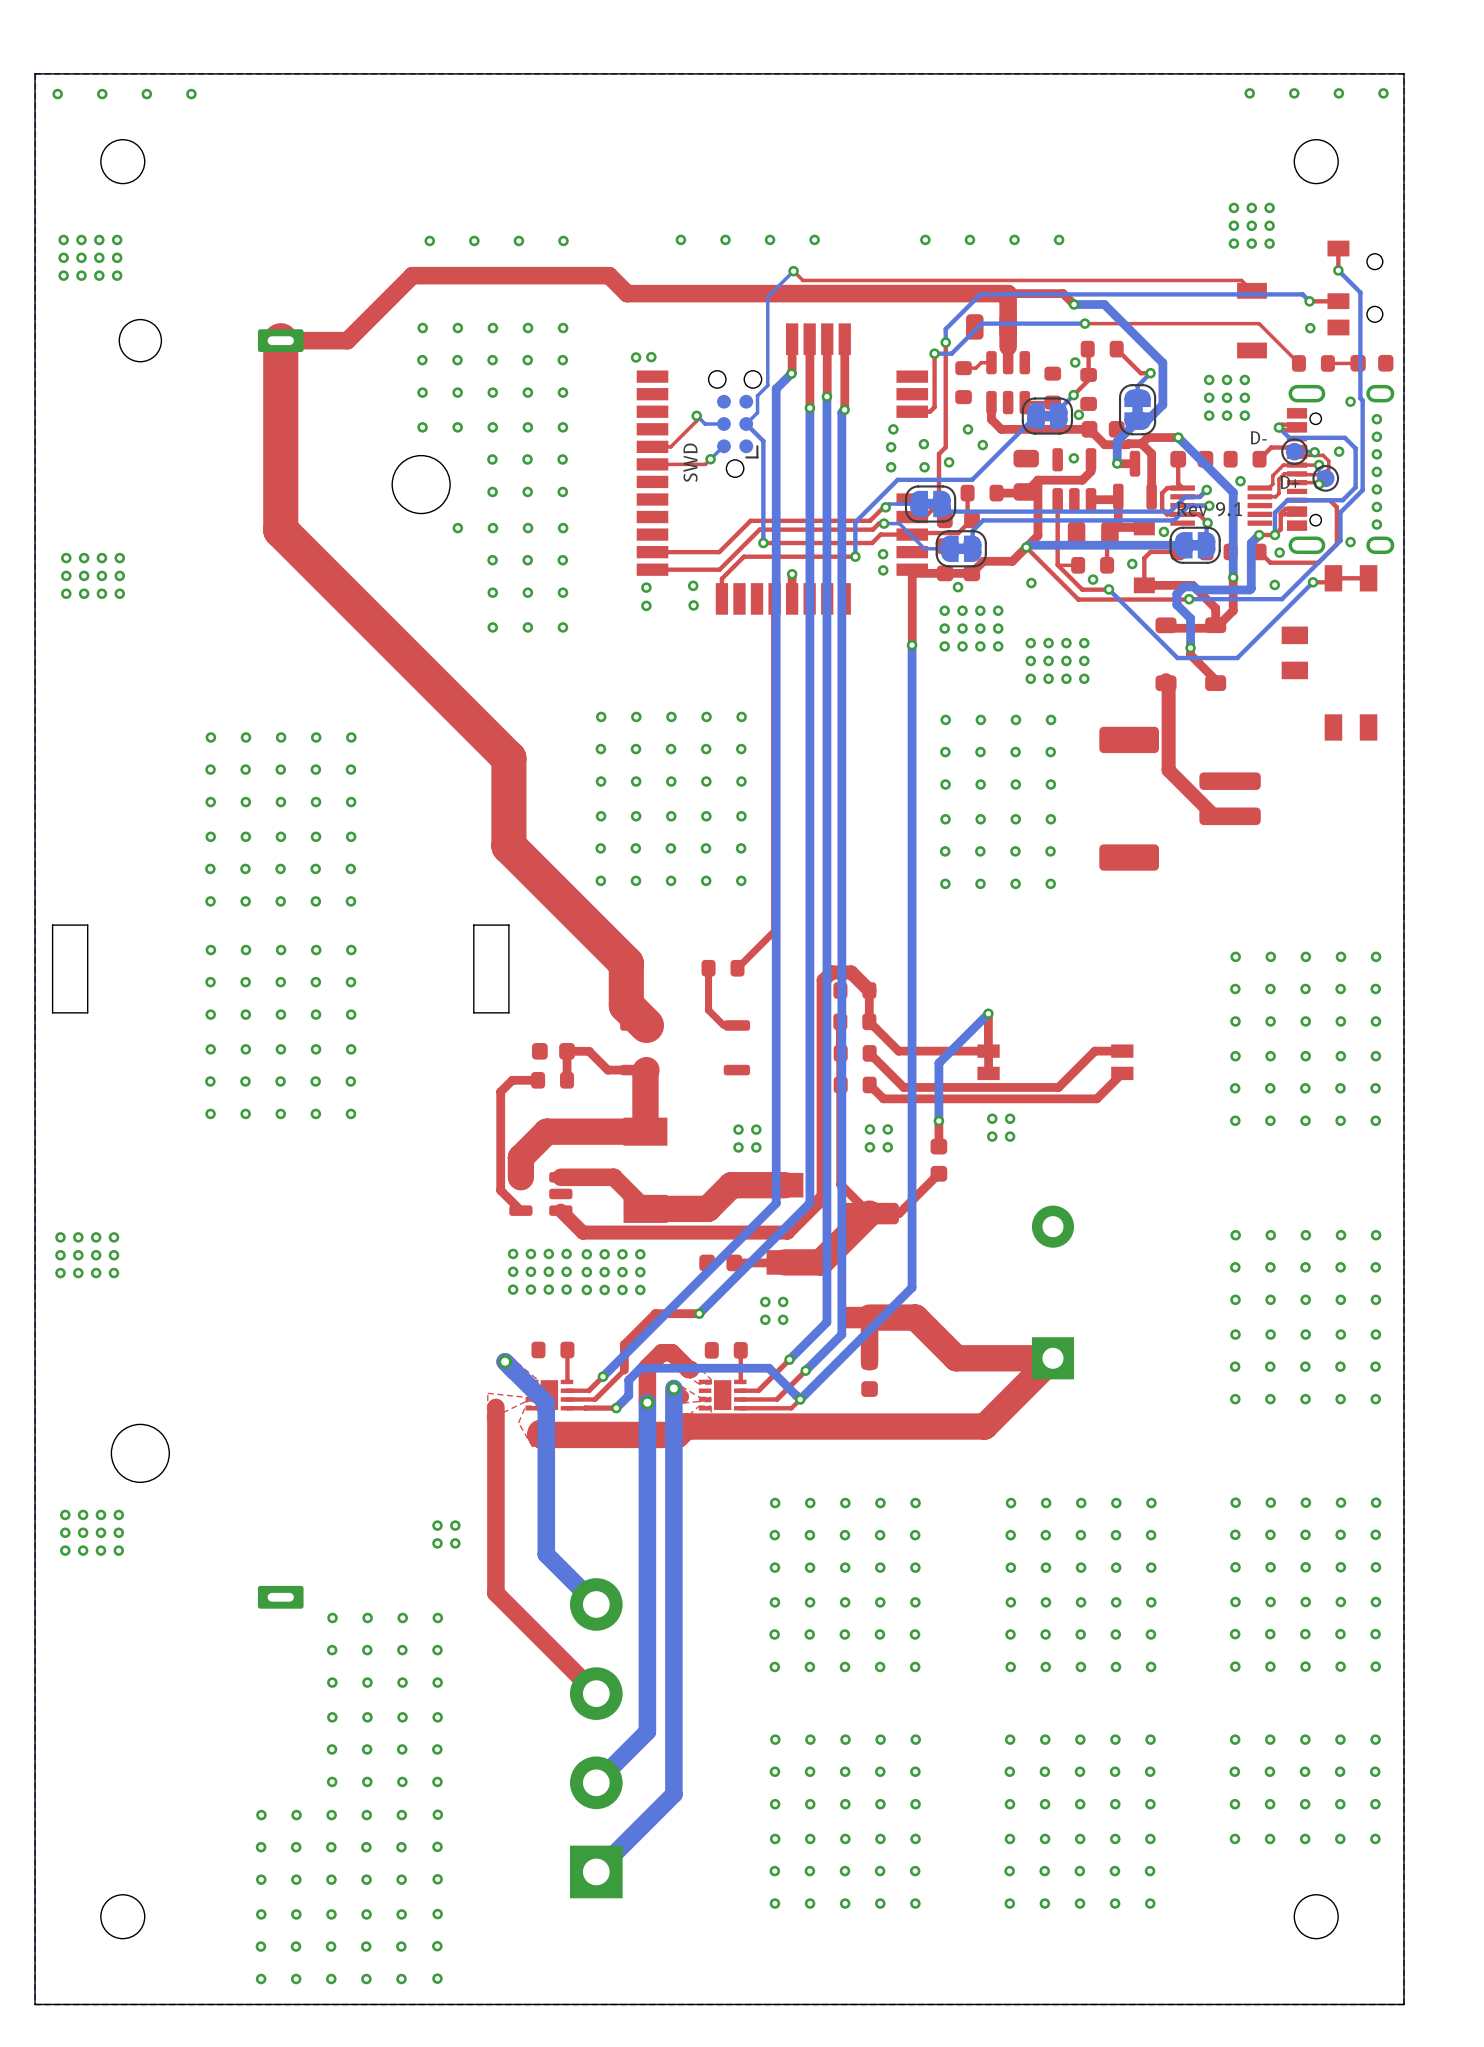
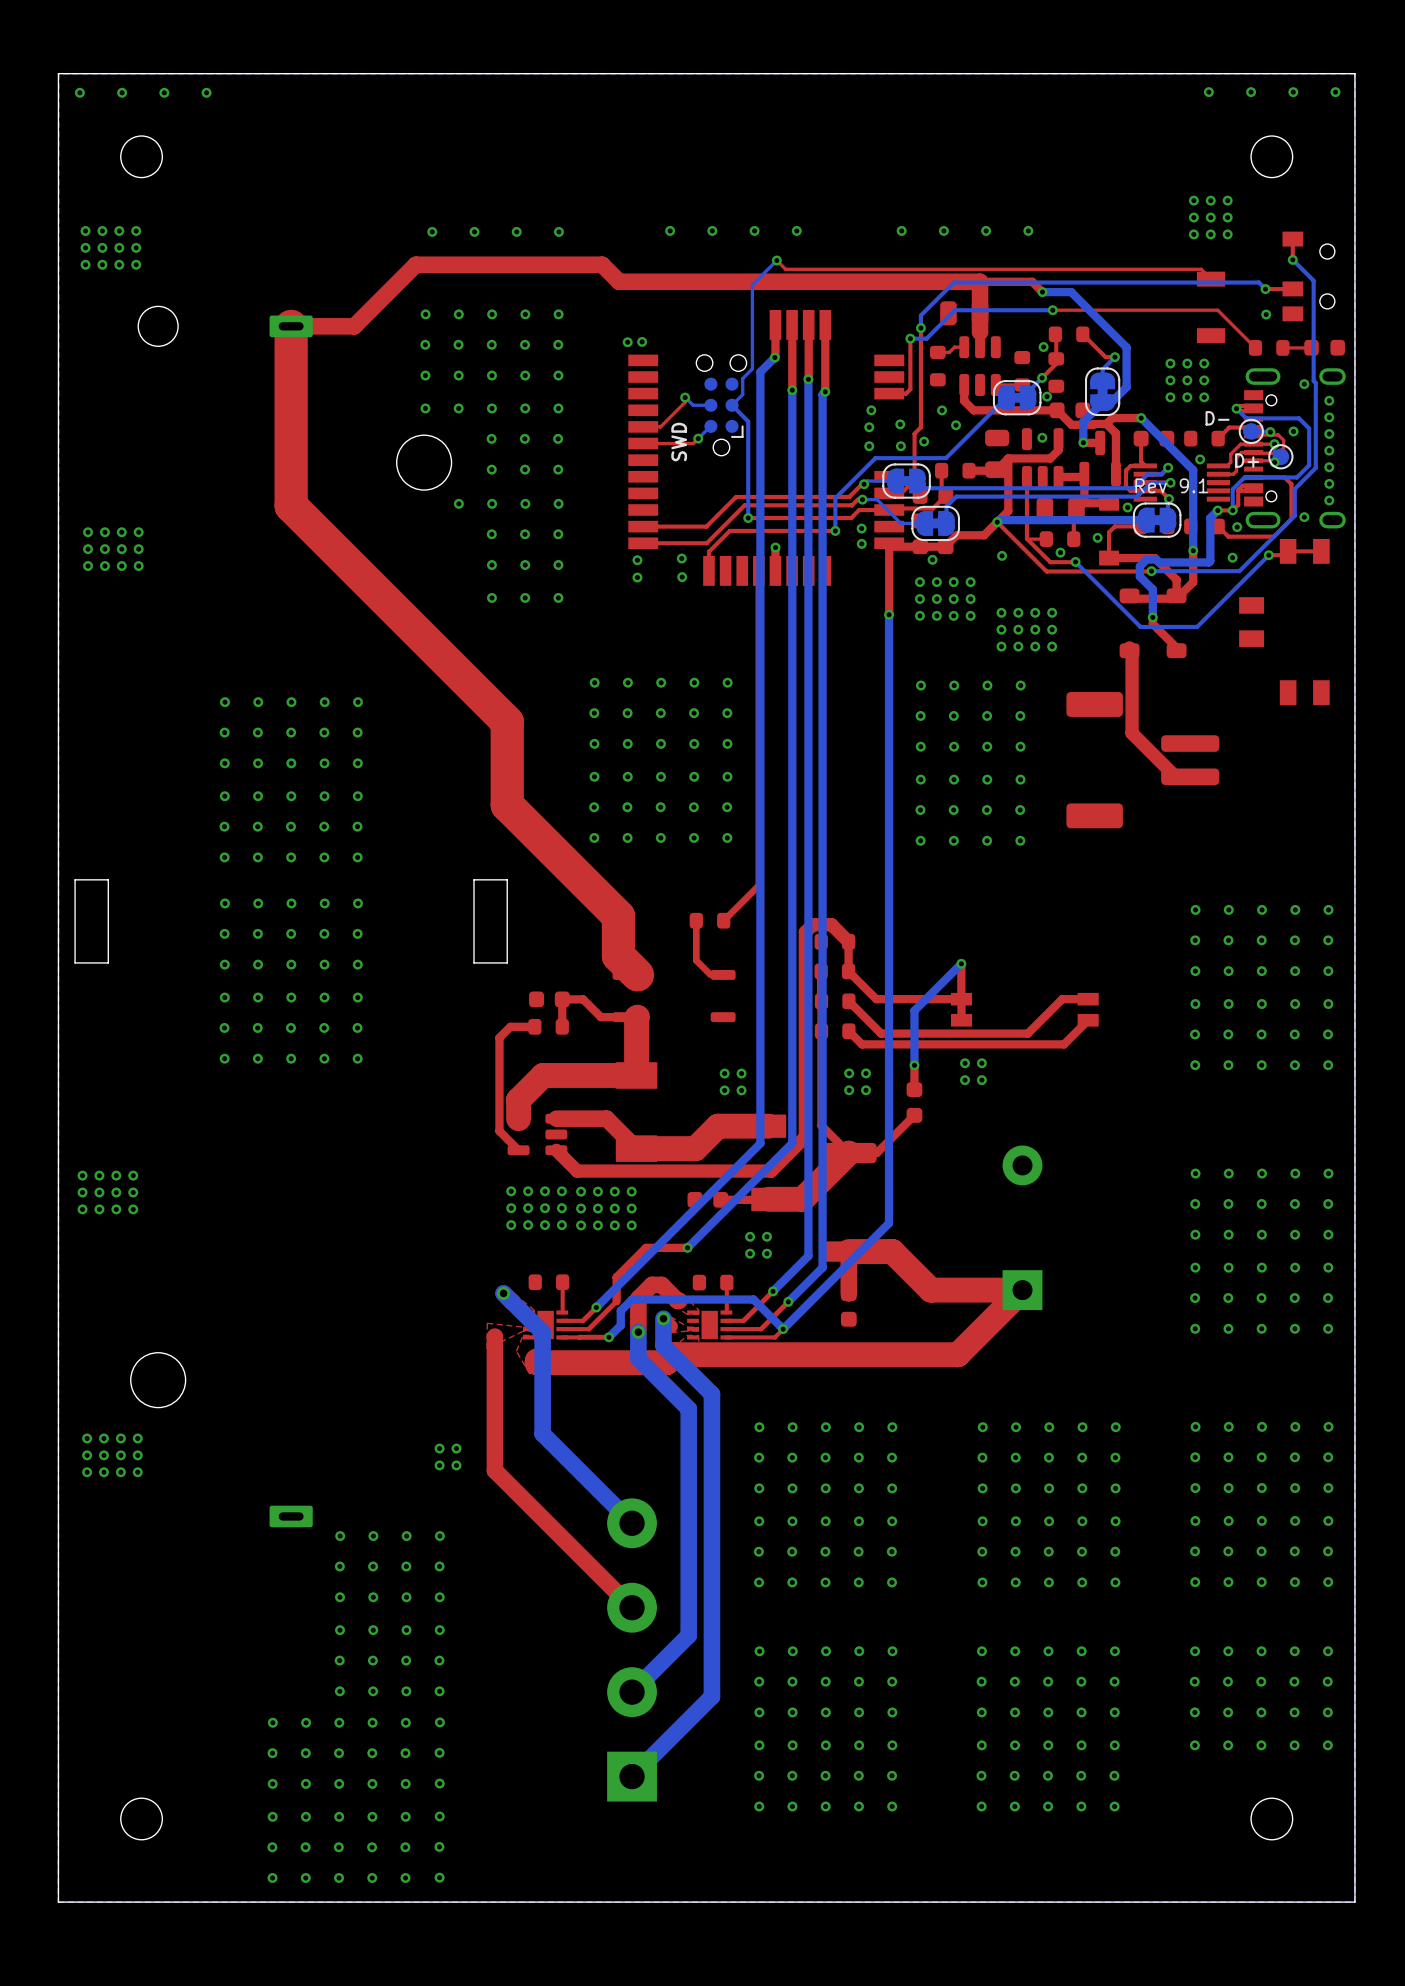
bottom track: (673, 1416) (673, 1794) (596, 1871) -> (663, 1345) (711, 1394) (711, 1696) (632, 1776)
bottom track: (647, 1430) (647, 1731) (596, 1782) -> (638, 1358) (688, 1408) (688, 1635) (632, 1692)
bottom track: (546, 1510) (546, 1554) (596, 1604) -> (542, 1433) (632, 1523)
top track: (495, 1548) (495, 1593) (596, 1693) -> (494, 1470) (632, 1607)
part position: (596, 1738) -> (632, 1649)

